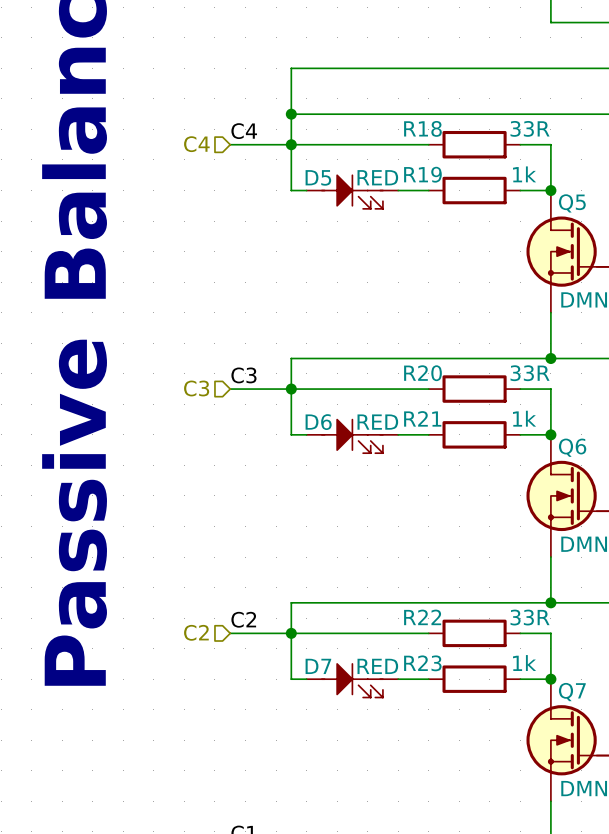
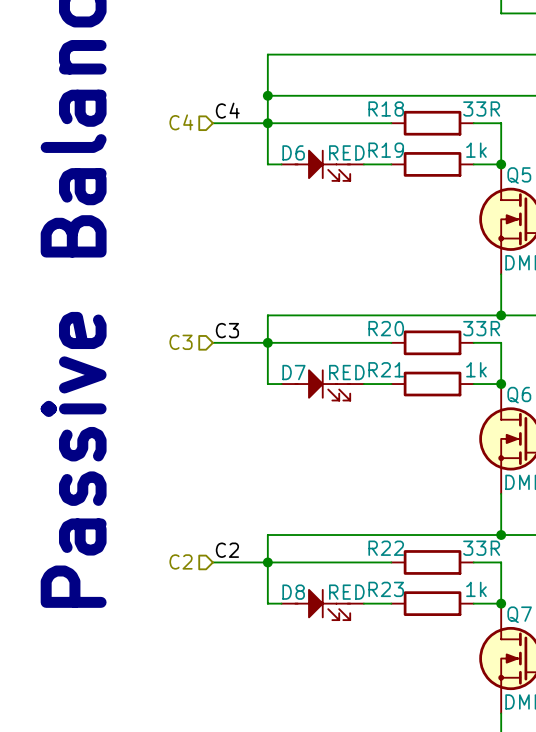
D5 name: D5 (318, 177) -> D6 (293, 152)
D6 name: D6 (318, 422) -> D7 (293, 372)
D7 name: D7 (318, 666) -> D8 (293, 592)

